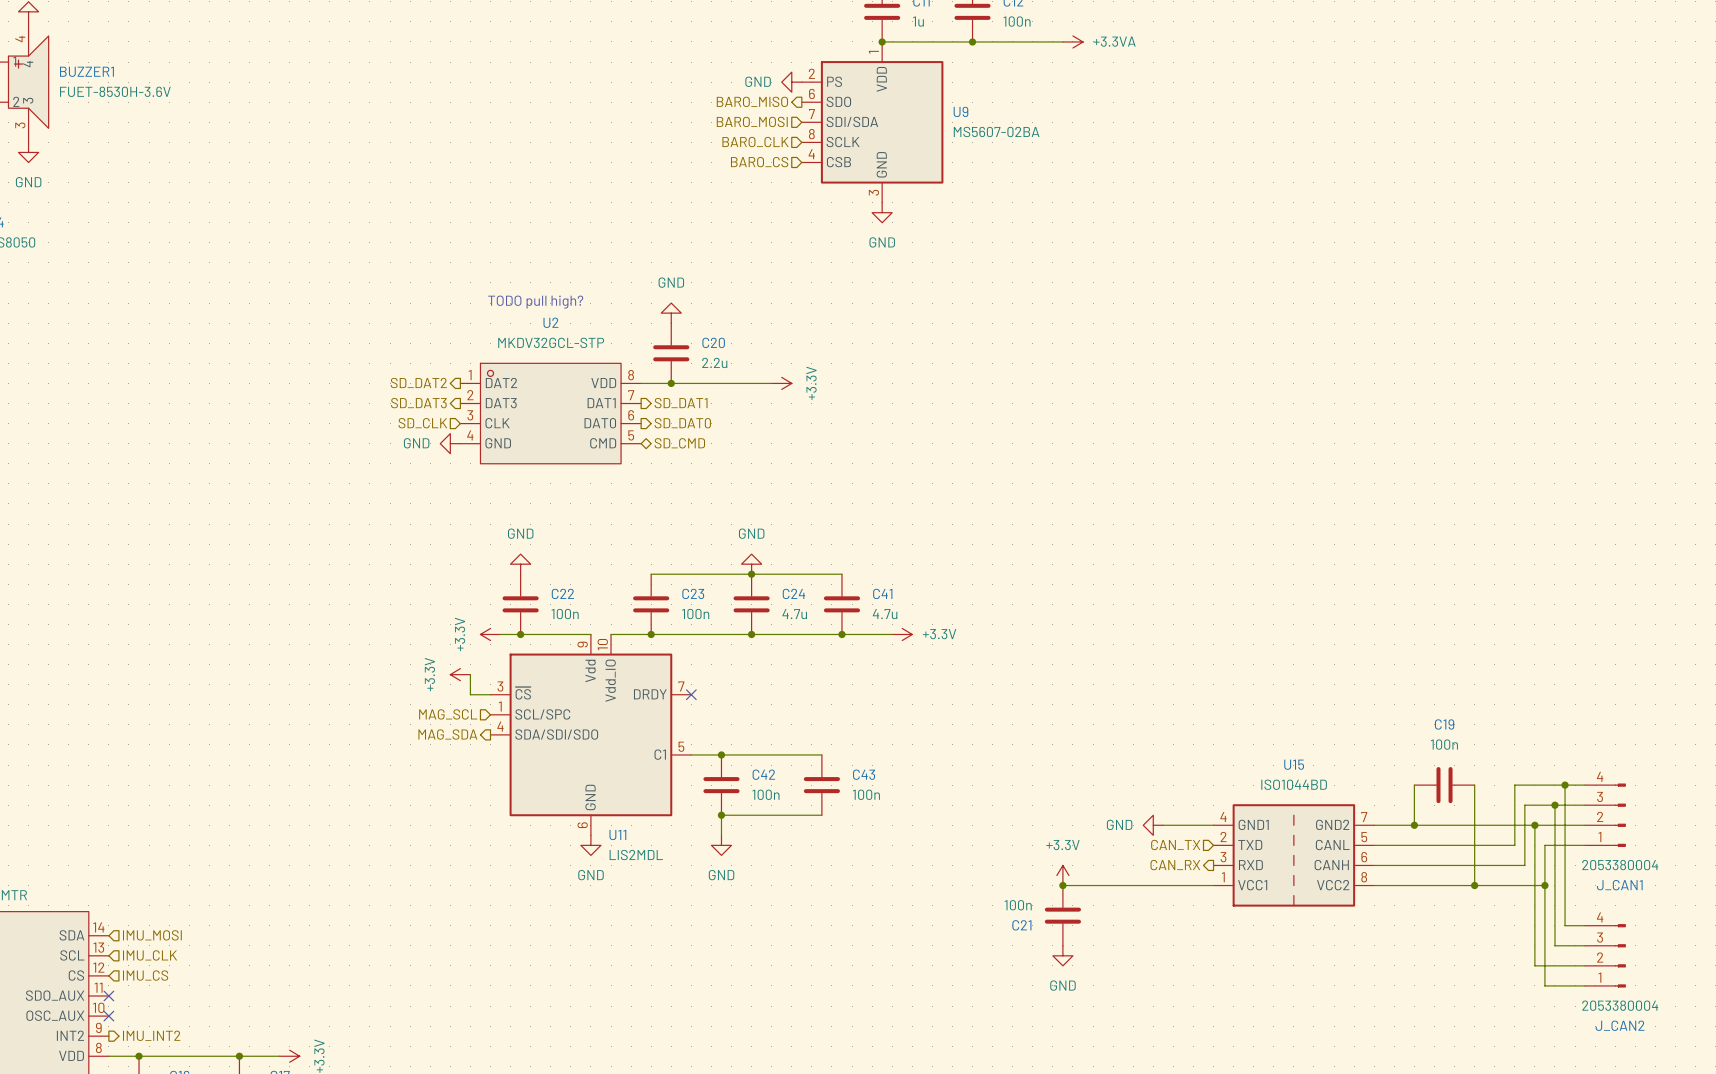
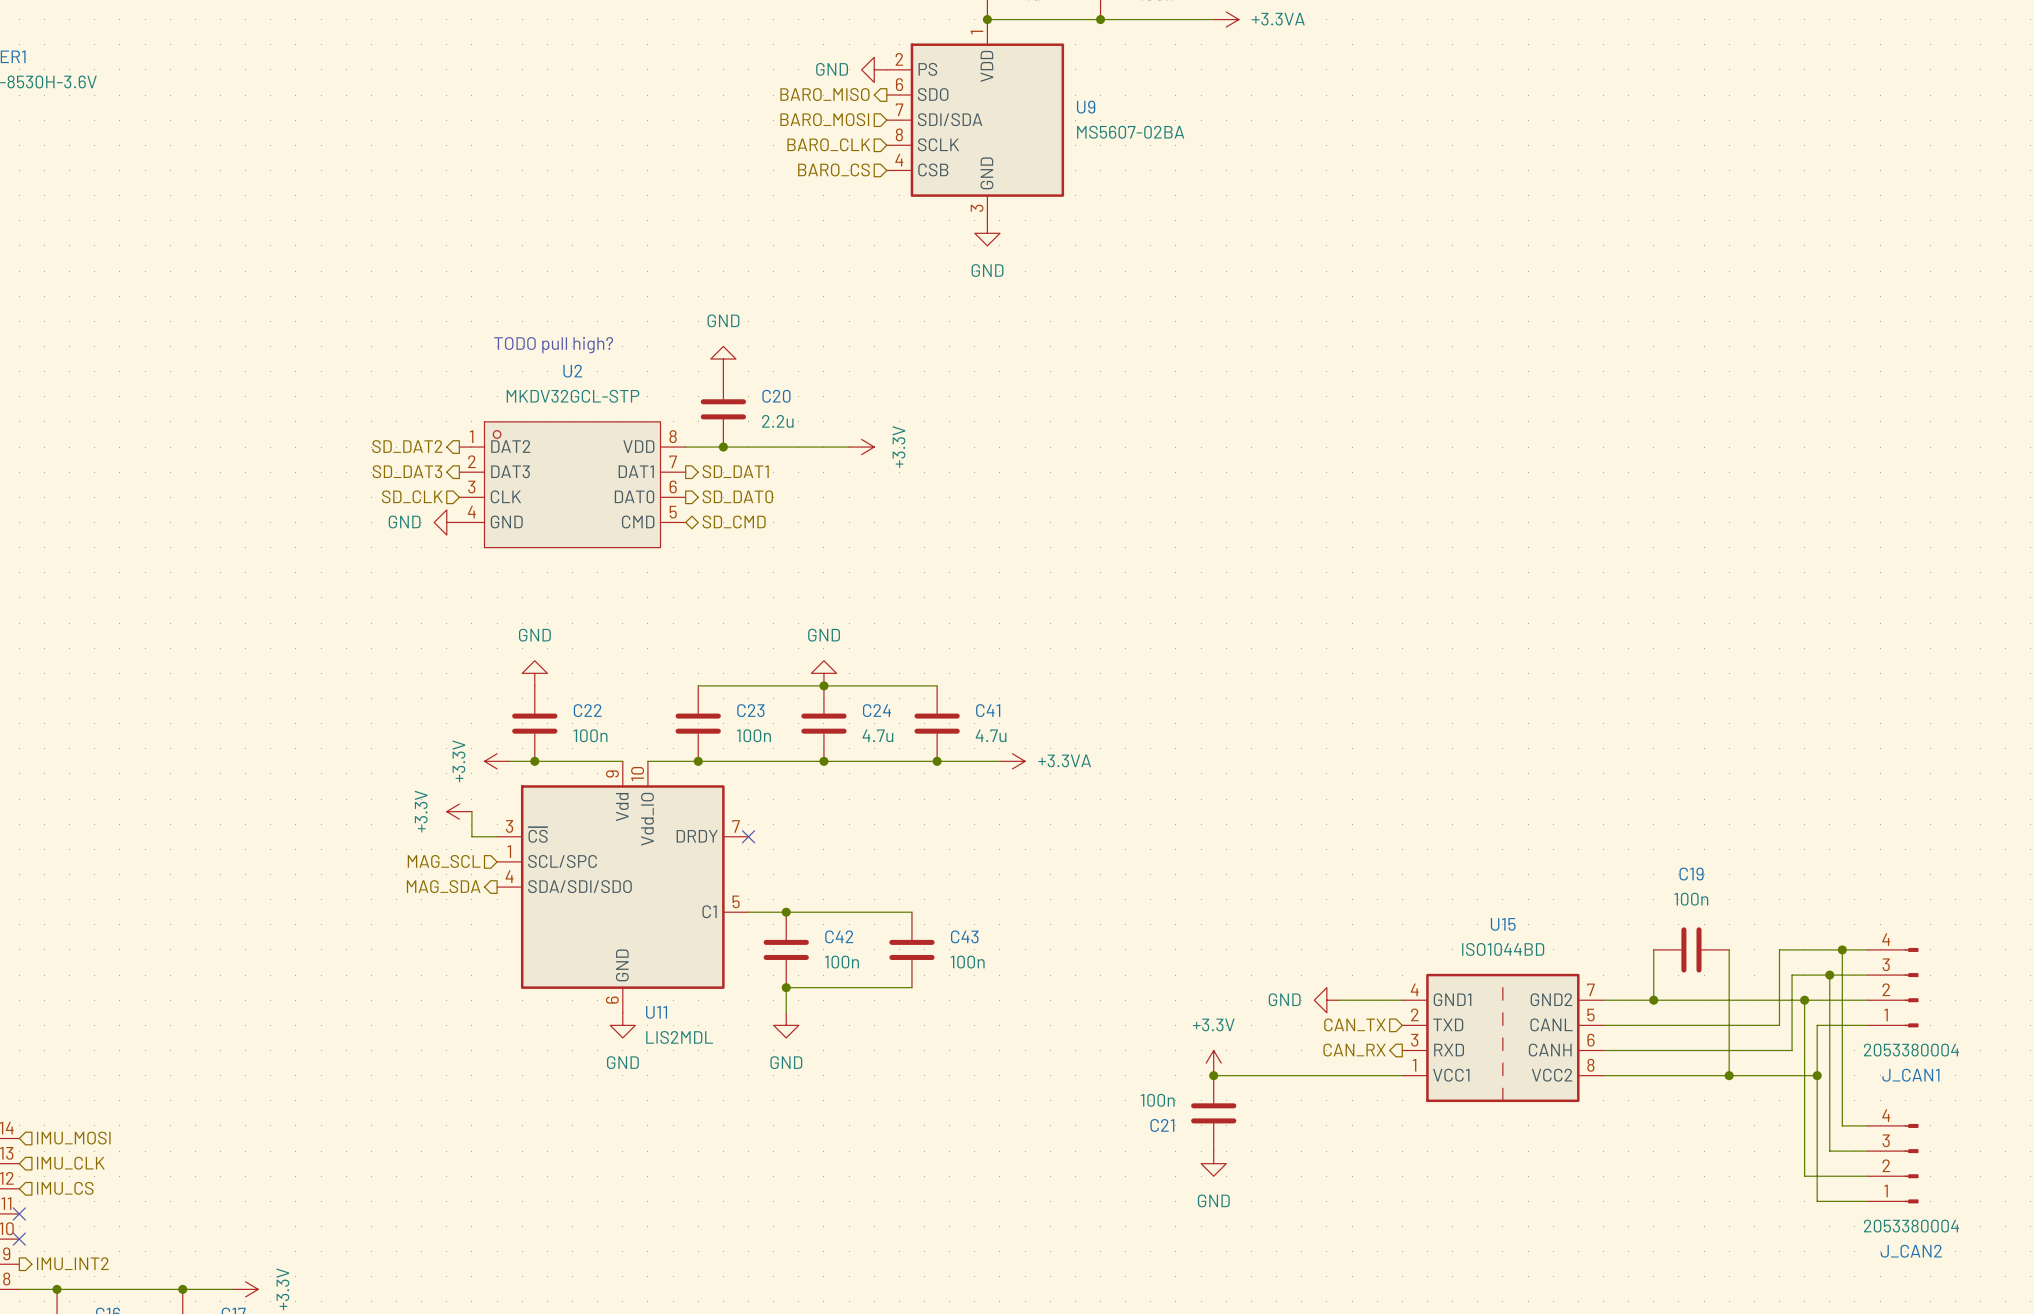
power symbol: +3.3V (902, 634) -> +3.3VA (1012, 761)

